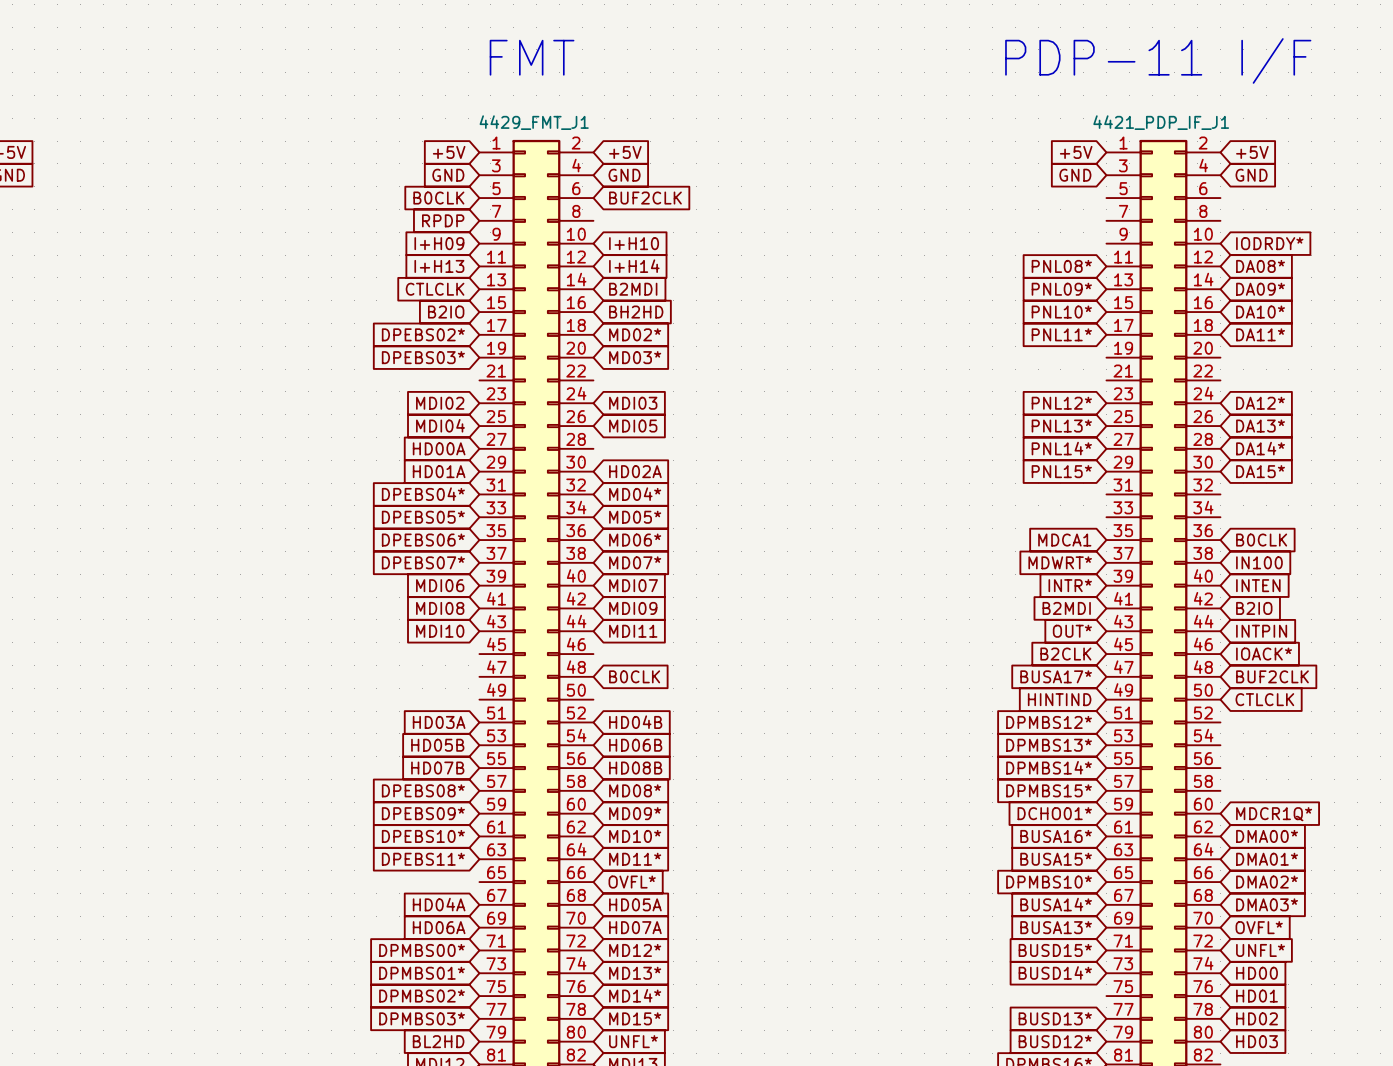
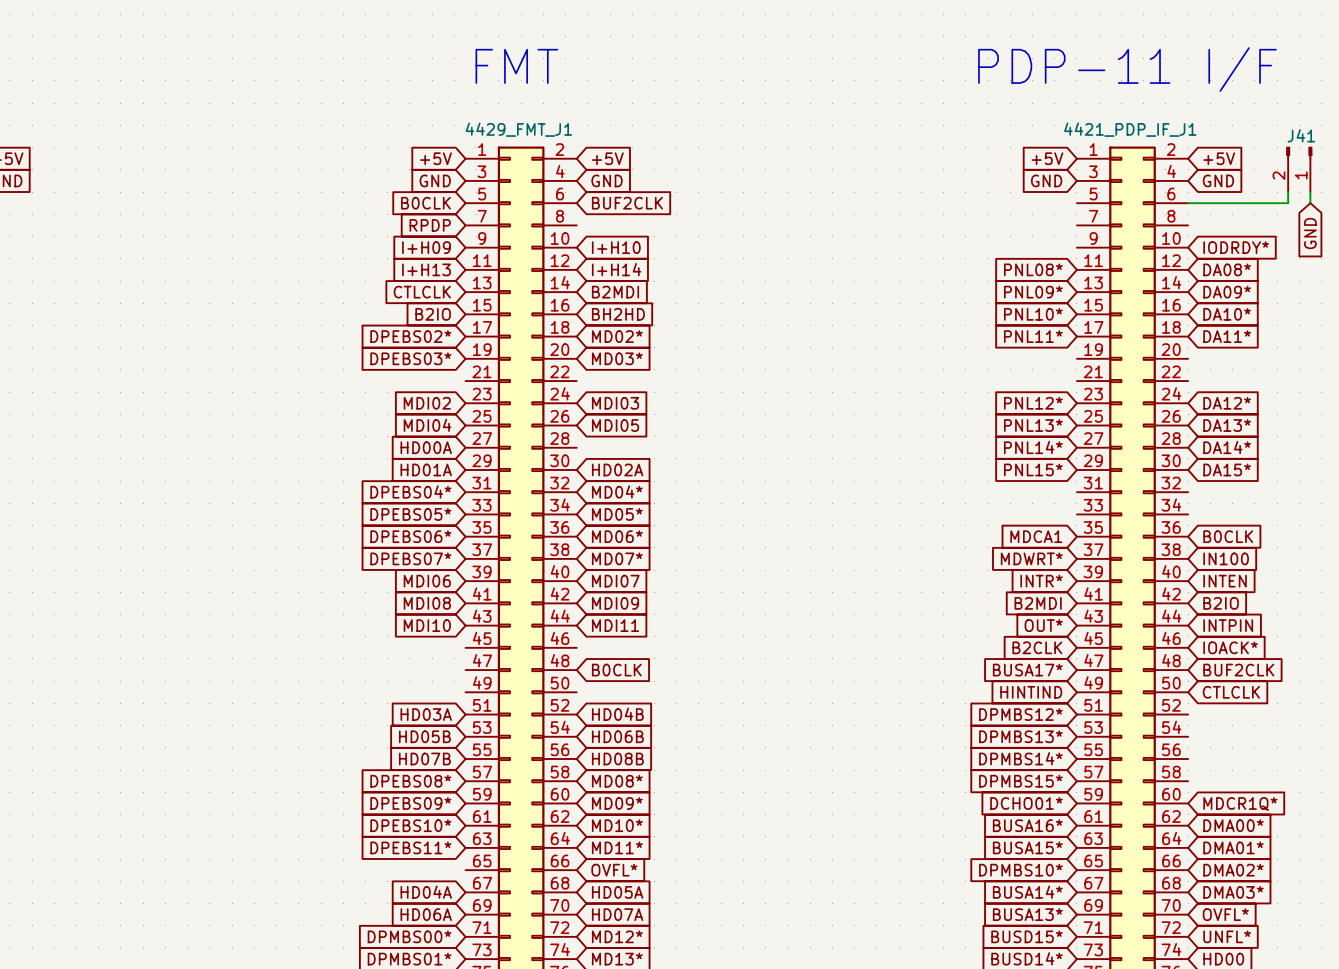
J41: none -> (1299, 169)
wire: none -> (1288, 192) (1288, 203) (1188, 203)
wire: none -> (1310, 192) (1310, 203)
global label: none -> GND (1310, 233)

